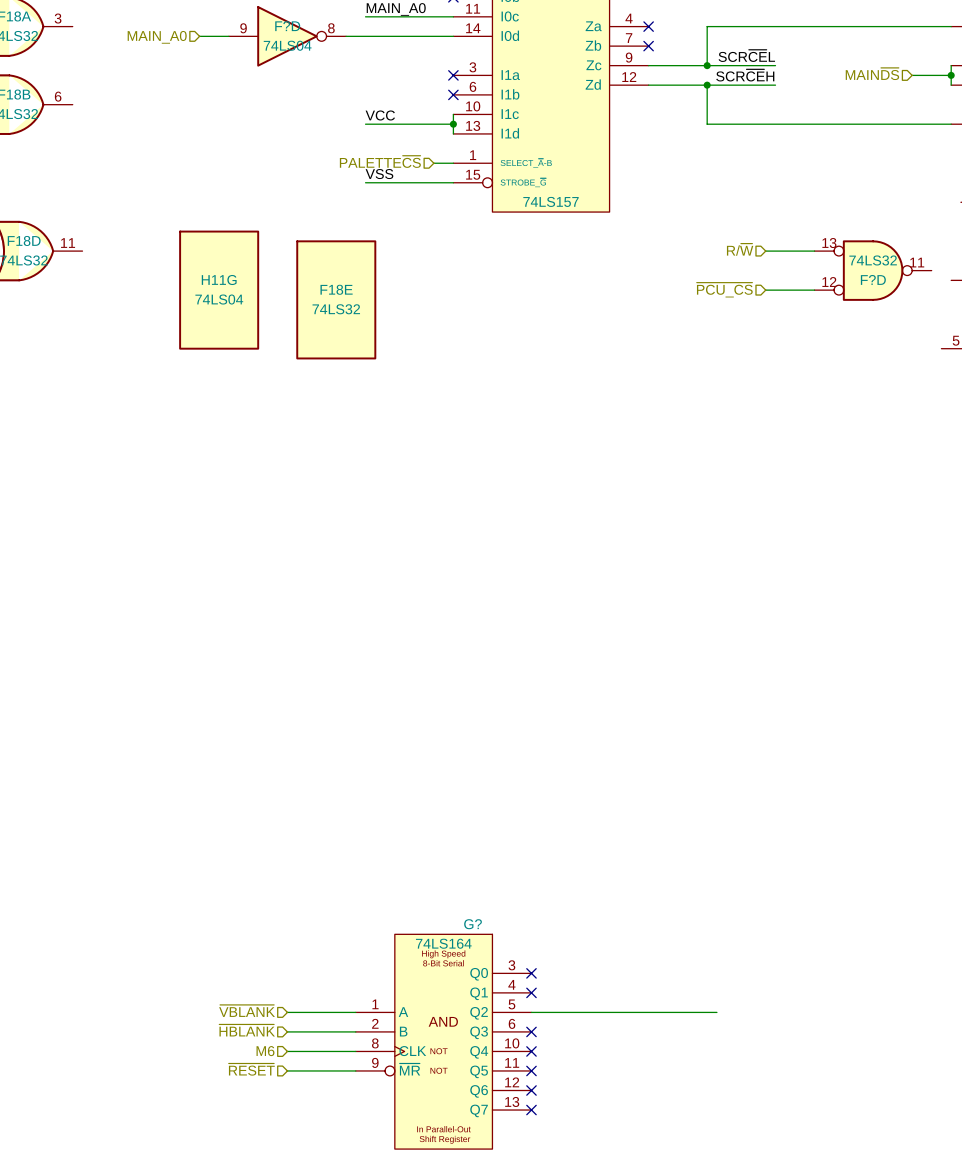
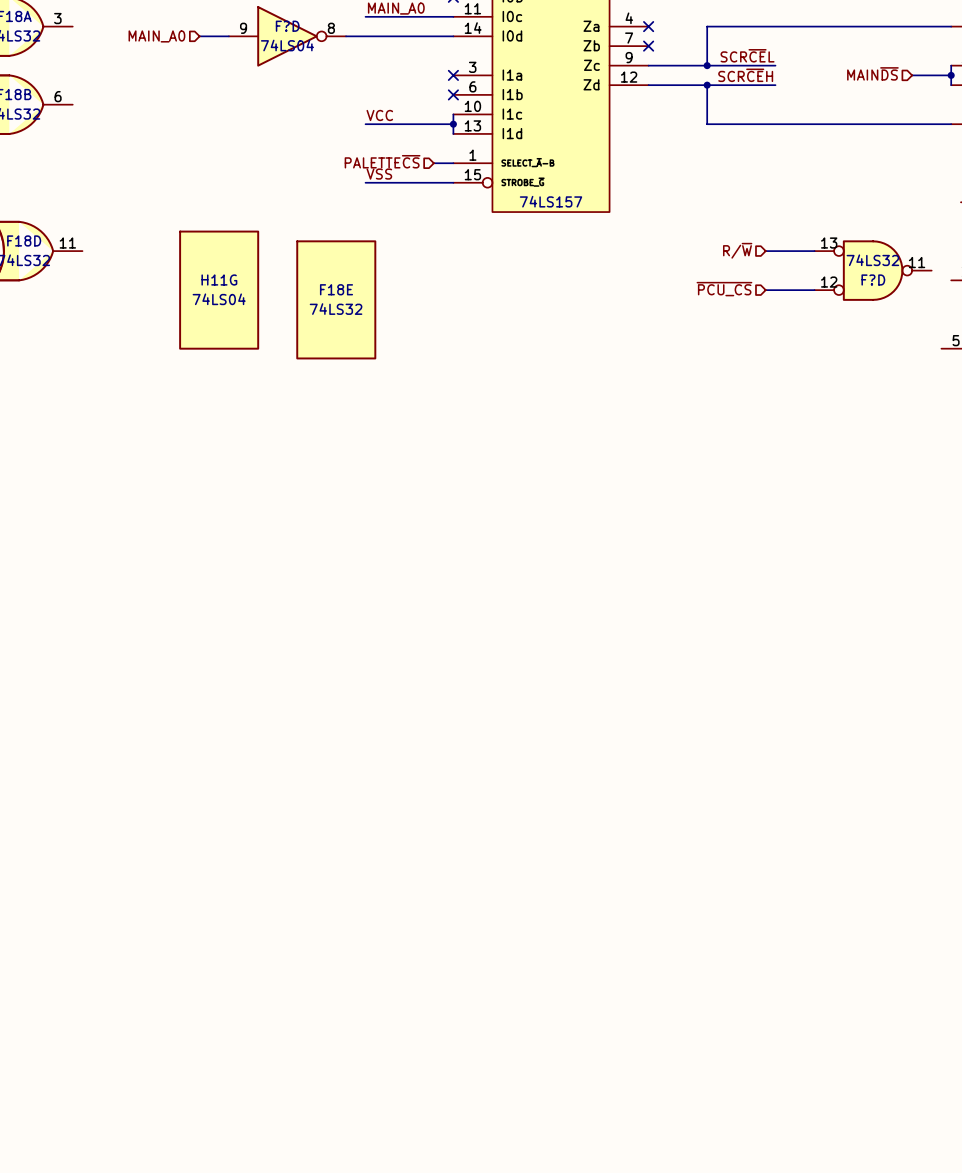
no-connect mark: (531, 973) -> none
no-connect mark: (531, 992) -> none
hierarchical label: ~{VBLANK} (247, 1010) -> none
wire: (287, 1012) (355, 1012) -> none
wire: (531, 1012) (716, 1012) -> none
hierarchical label: ~{HBLANK} (247, 1030) -> none
wire: (287, 1031) (355, 1031) -> none
no-connect mark: (531, 1031) -> none
G?: 74LS164 (443, 1041) -> none
hierarchical label: M6 (265, 1051) -> none
wire: (287, 1051) (355, 1051) -> none
no-connect mark: (531, 1051) -> none
hierarchical label: ~{RESET} (251, 1069) -> none
wire: (287, 1070) (355, 1070) -> none
no-connect mark: (531, 1070) -> none
no-connect mark: (531, 1090) -> none
no-connect mark: (531, 1110) -> none

